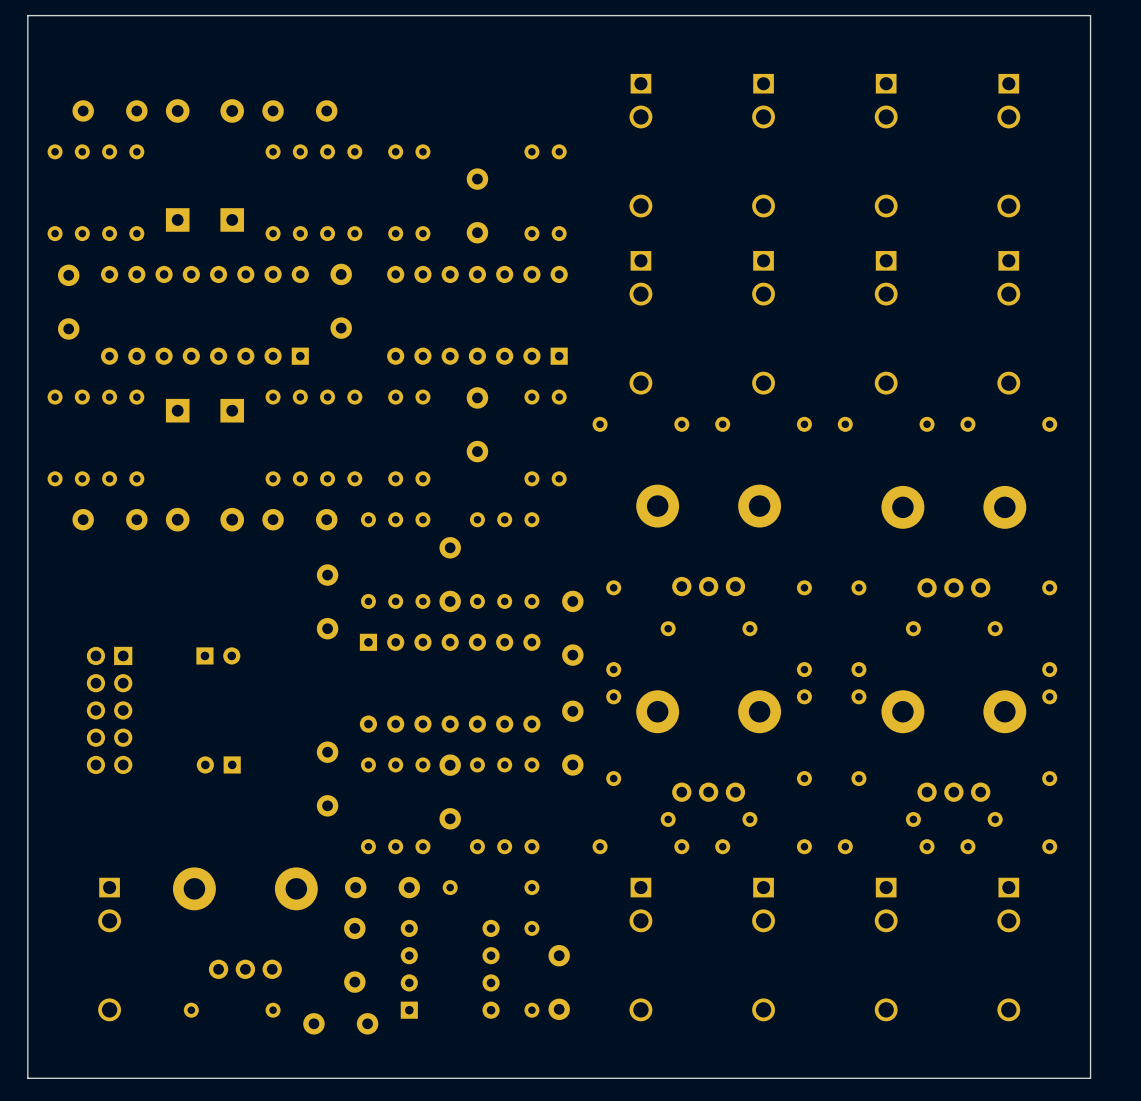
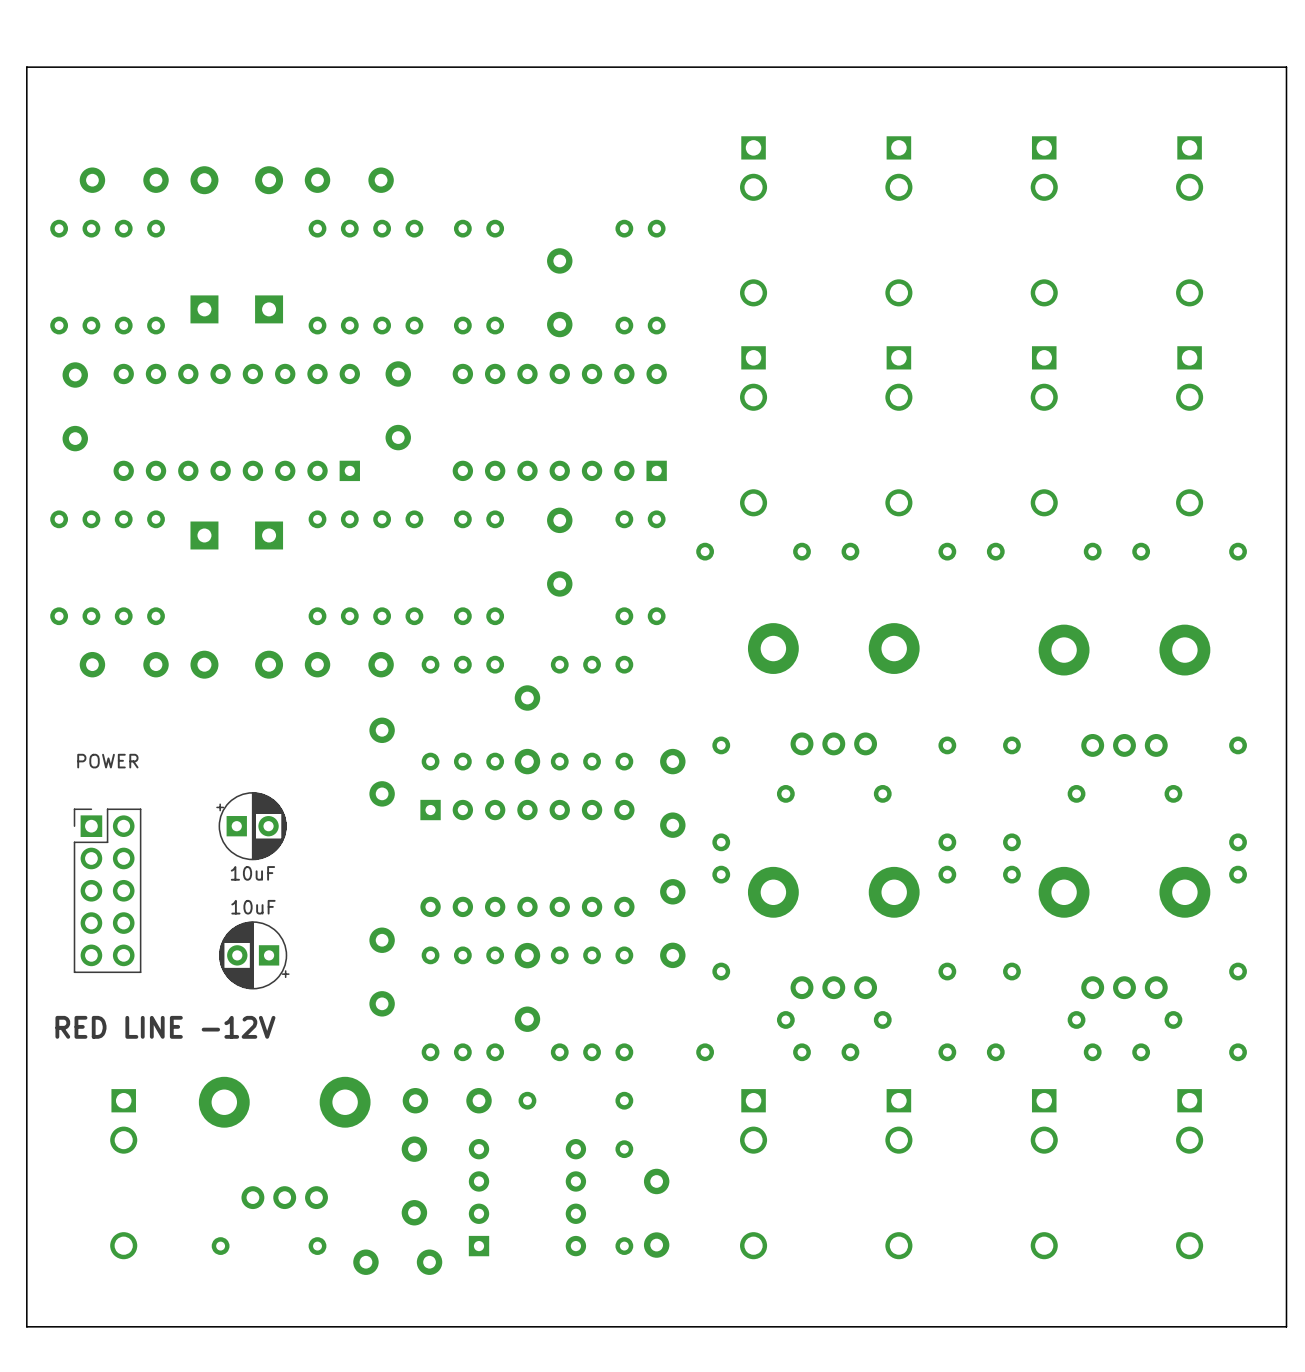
part side: top (218, 655) -> bottom (251, 826)
part side: top (109, 710) -> bottom (107, 890)
part side: top (218, 764) -> bottom (254, 955)
text: none -> RED LINE -12V (165, 1027)

